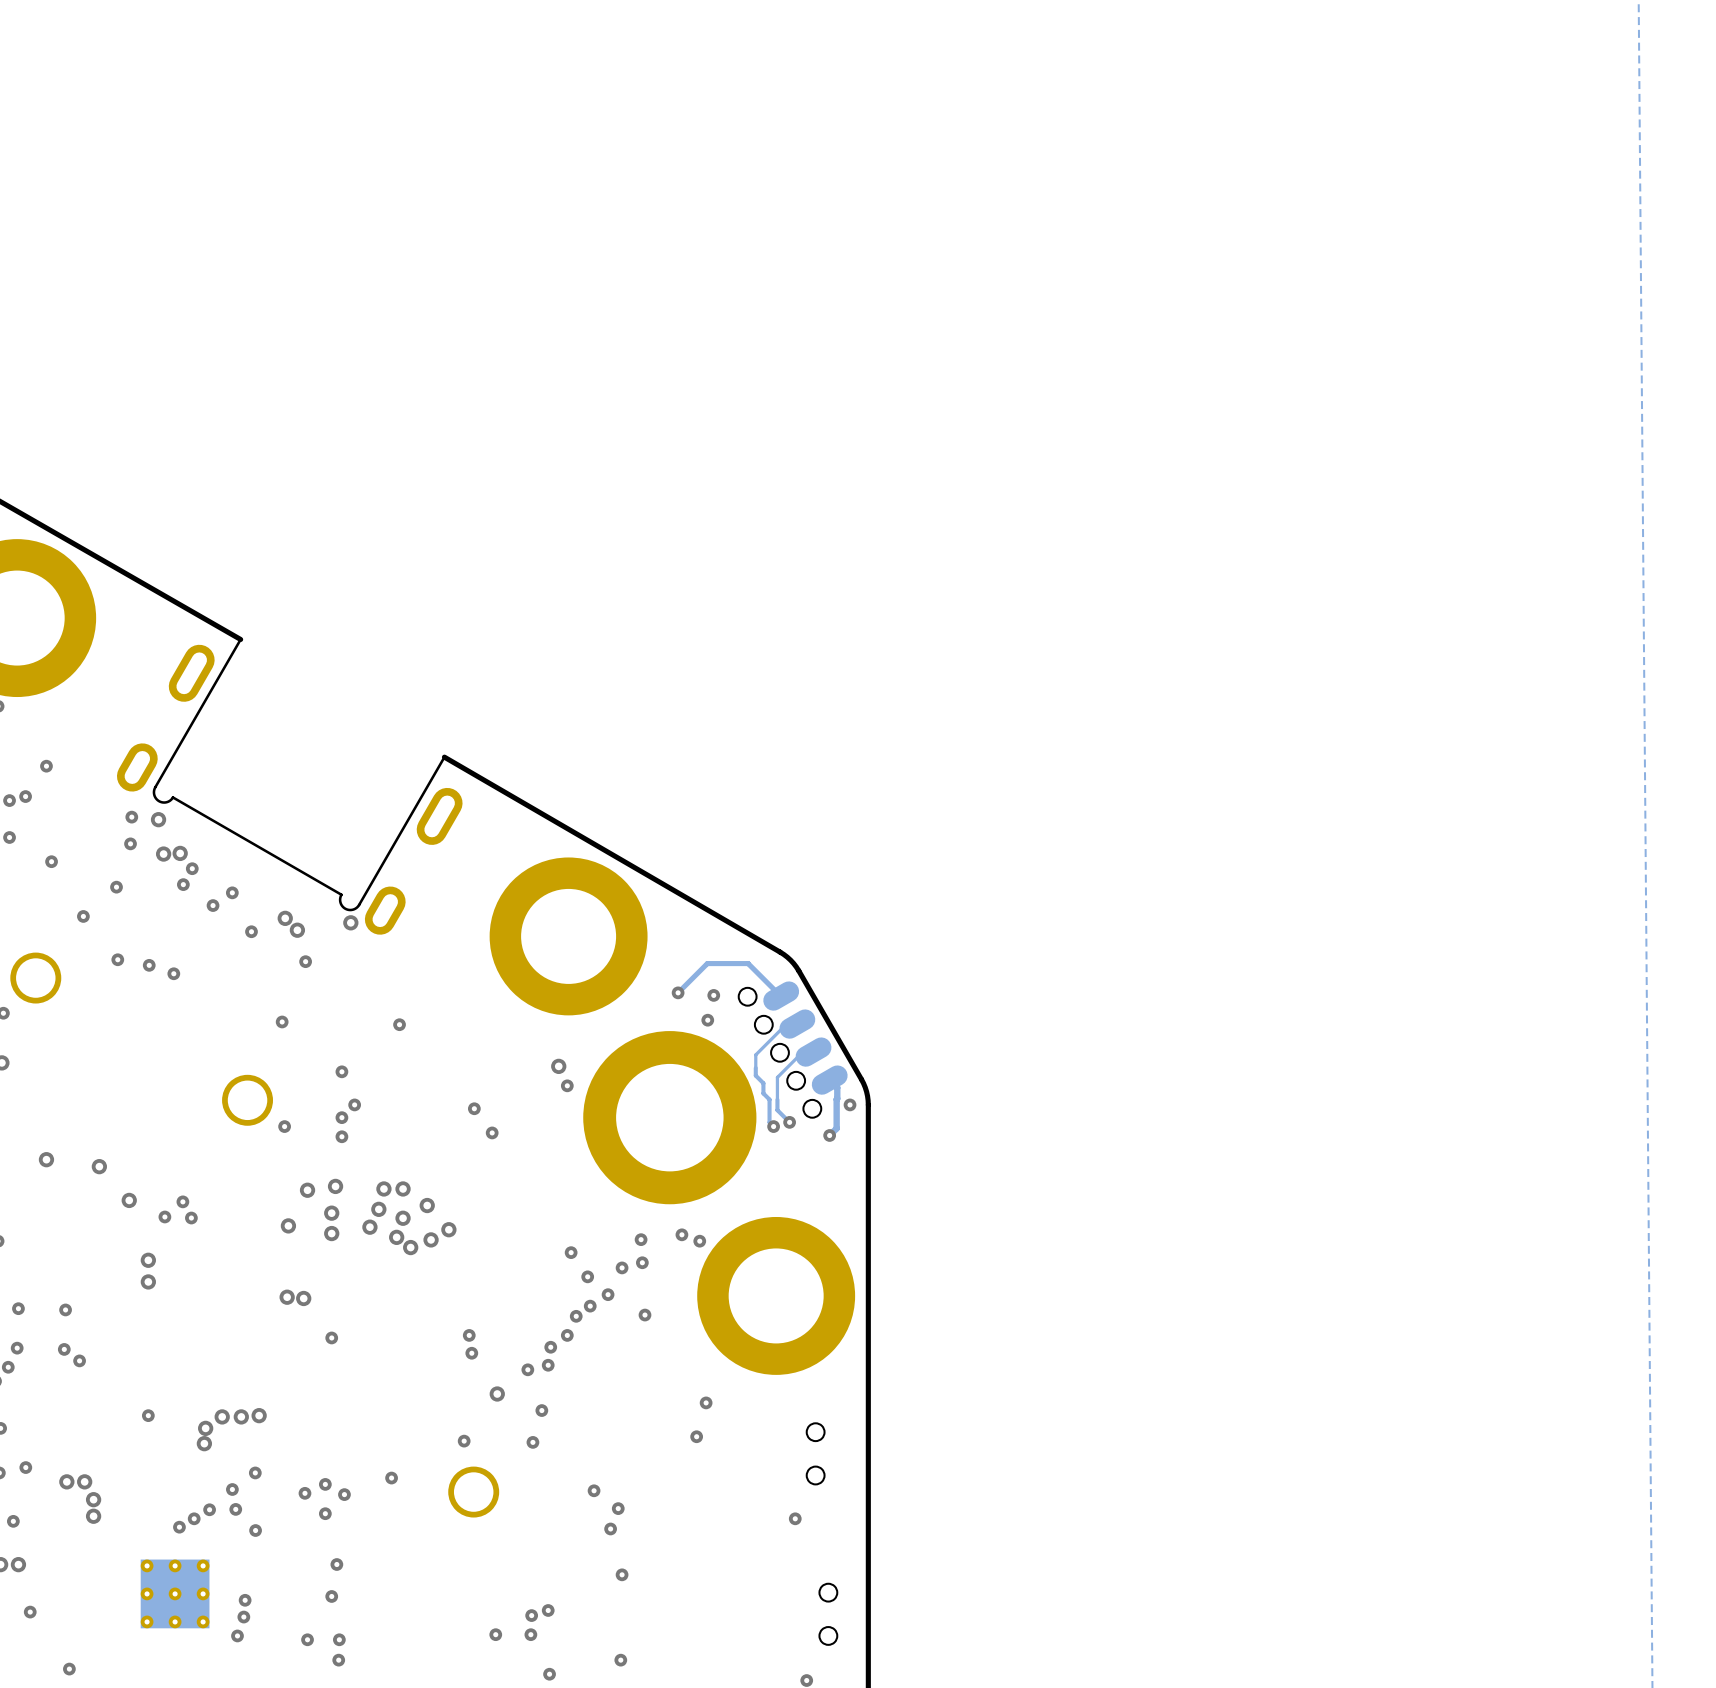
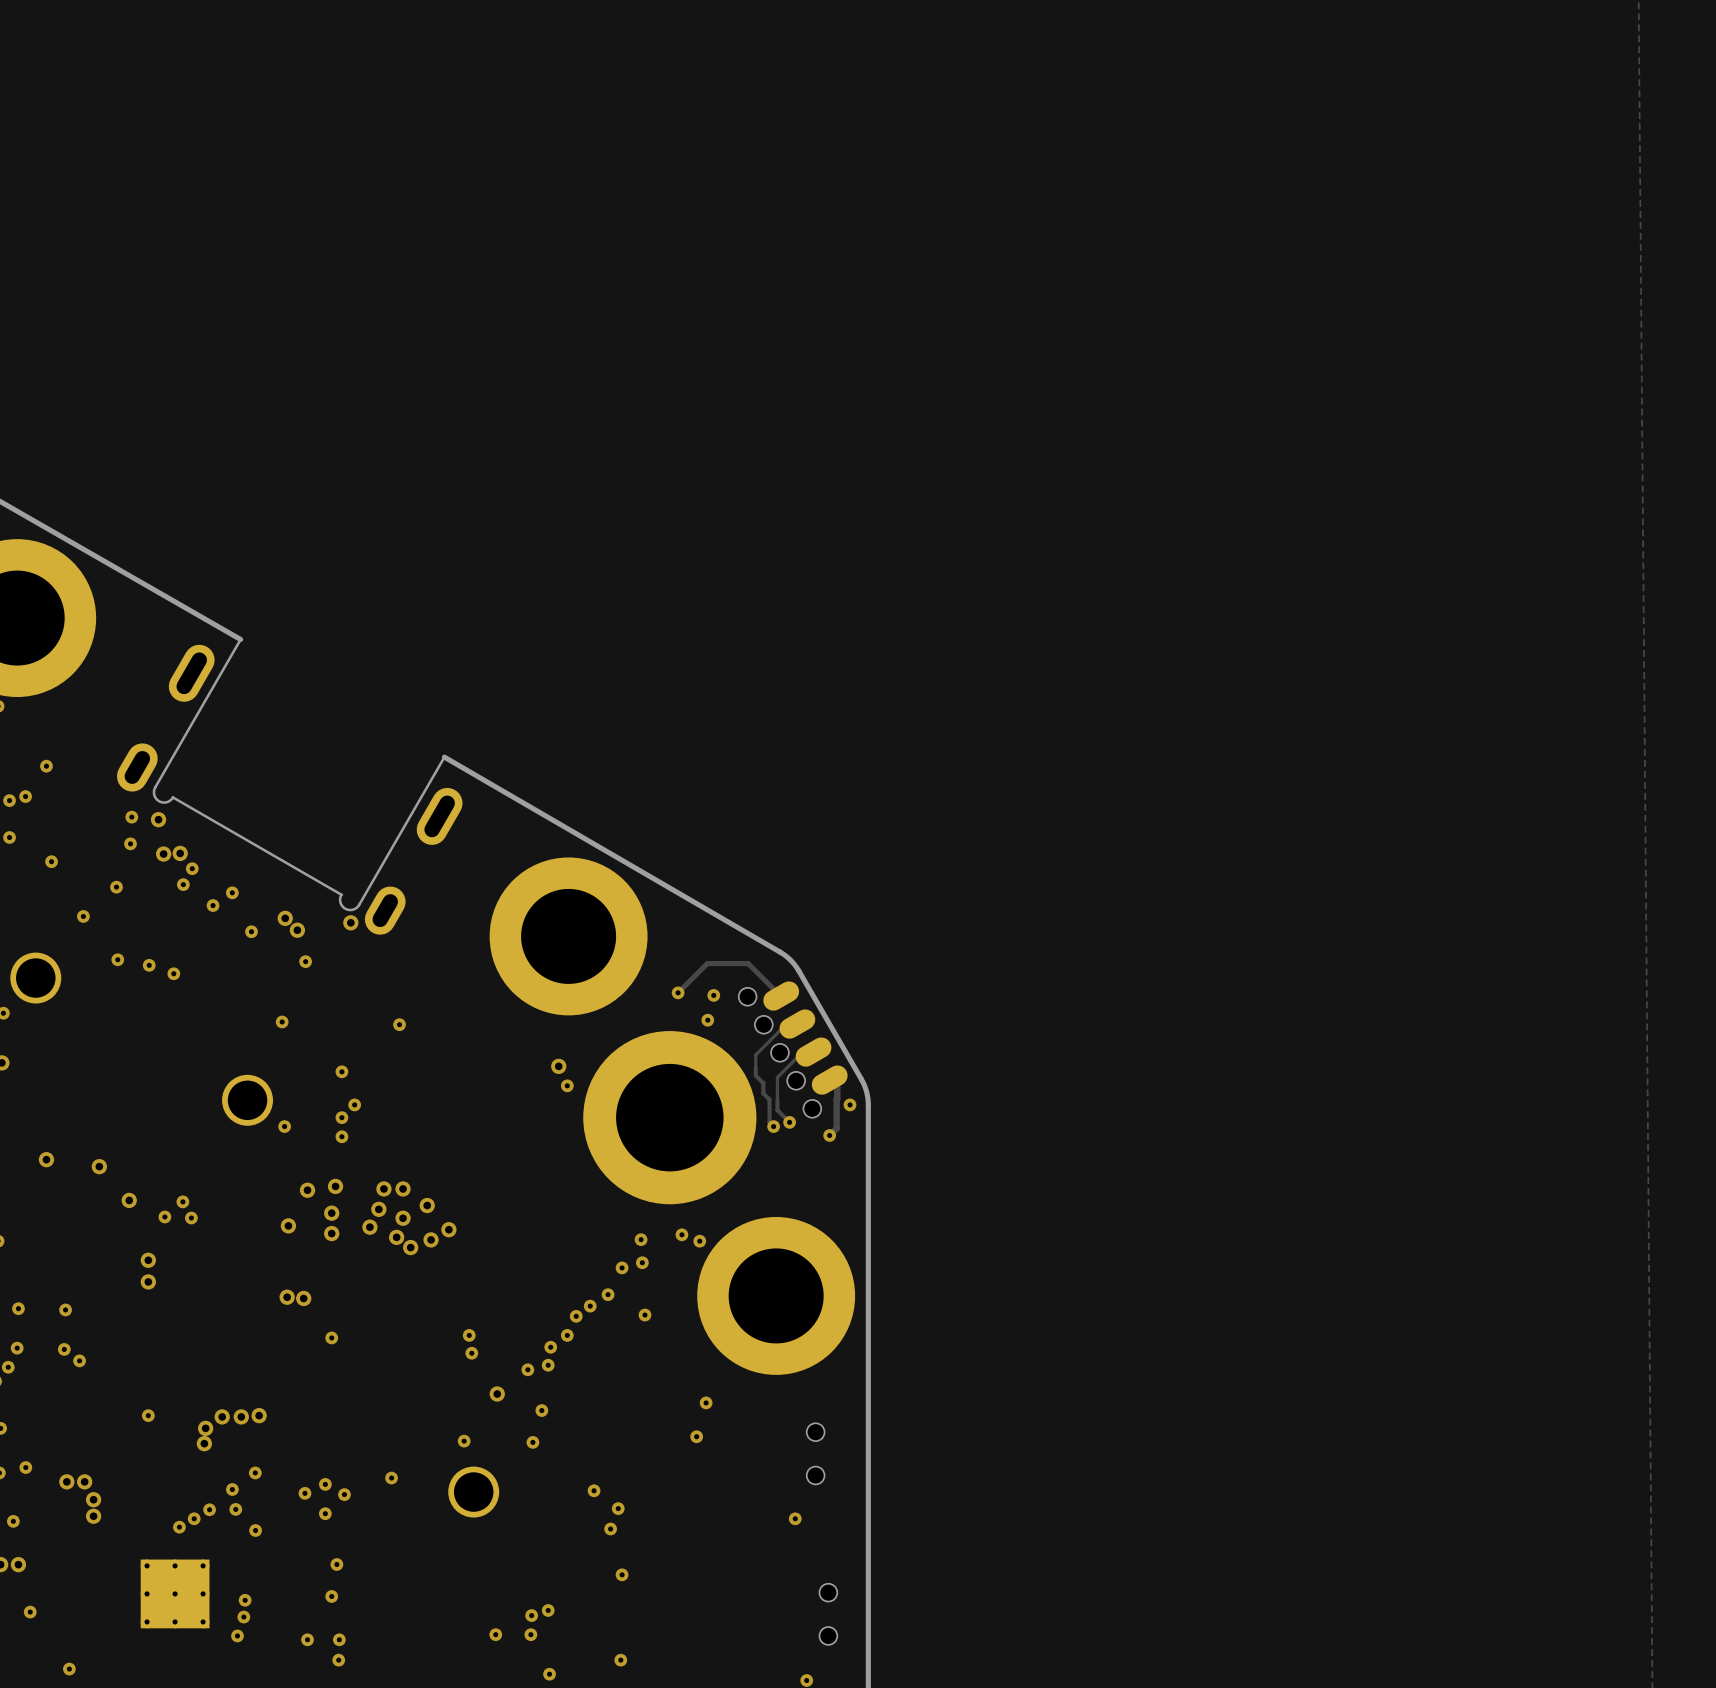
via: (474, 1108) -> none
via: (492, 1132) -> none
via: (571, 1252) -> none
via: (587, 1276) -> none

